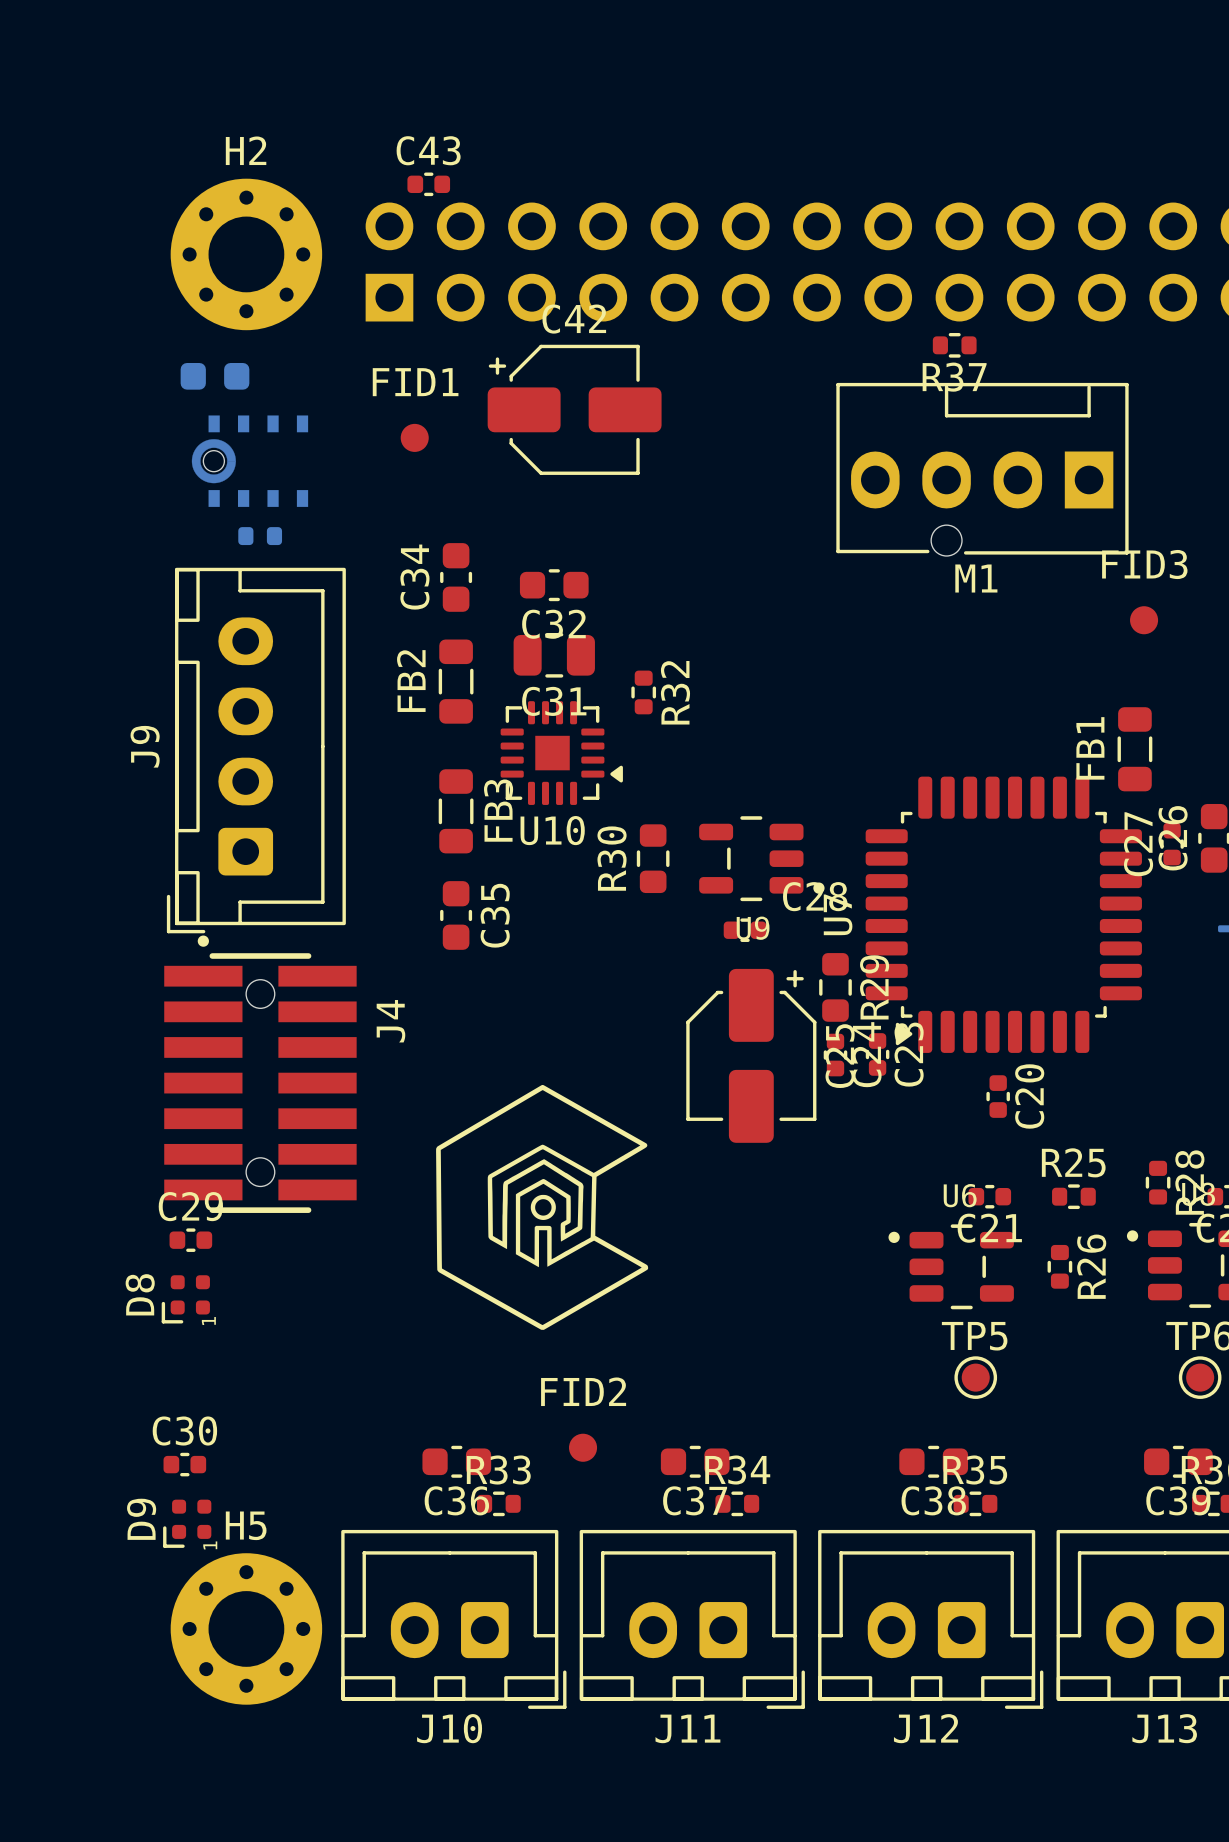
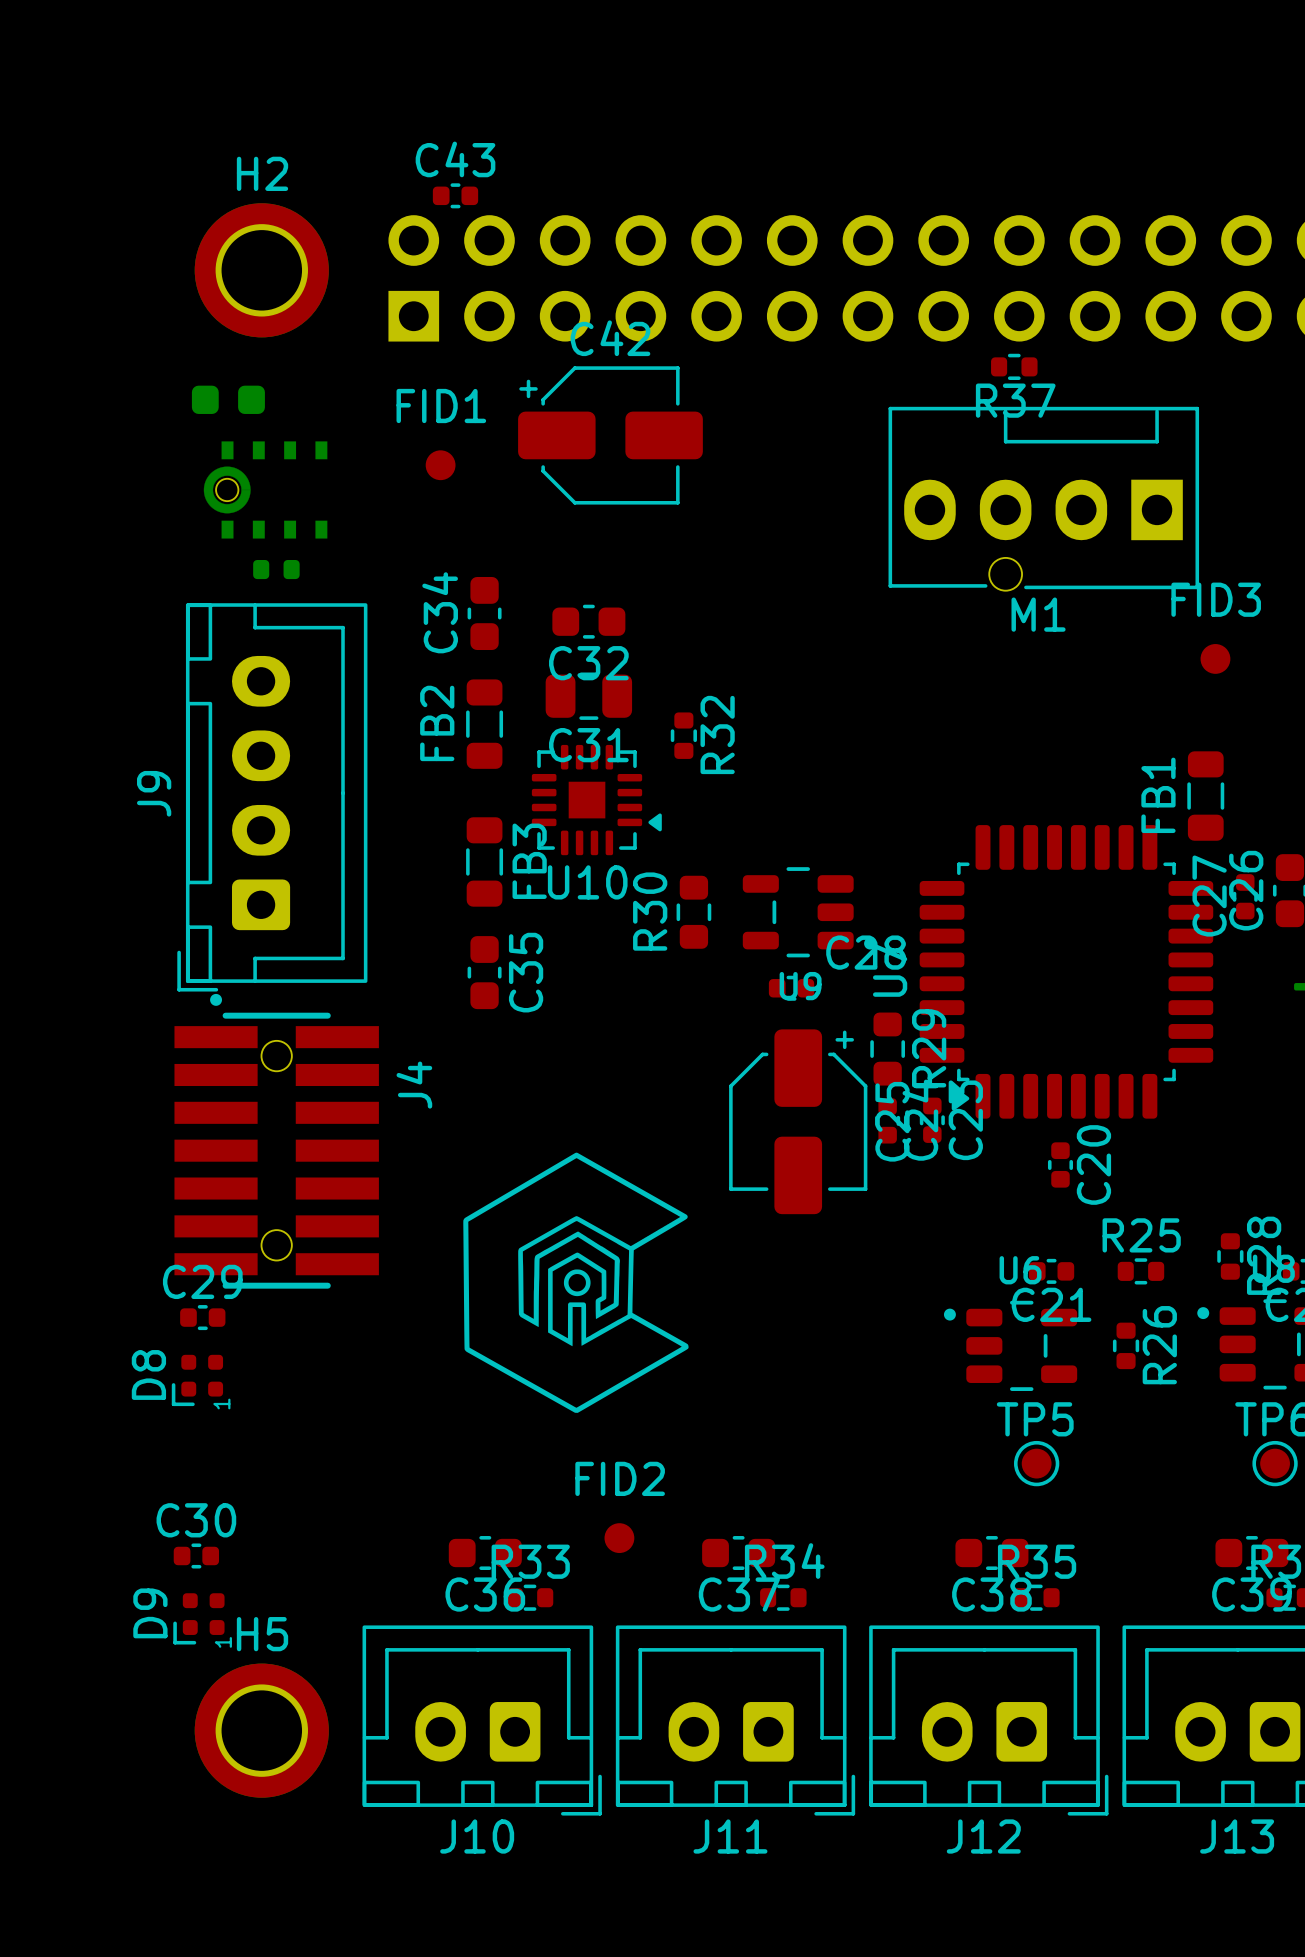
H2 footprint: [170, 178, 323, 331] -> [194, 203, 329, 338]
H5 footprint: [170, 1553, 323, 1705] -> [194, 1663, 329, 1798]

